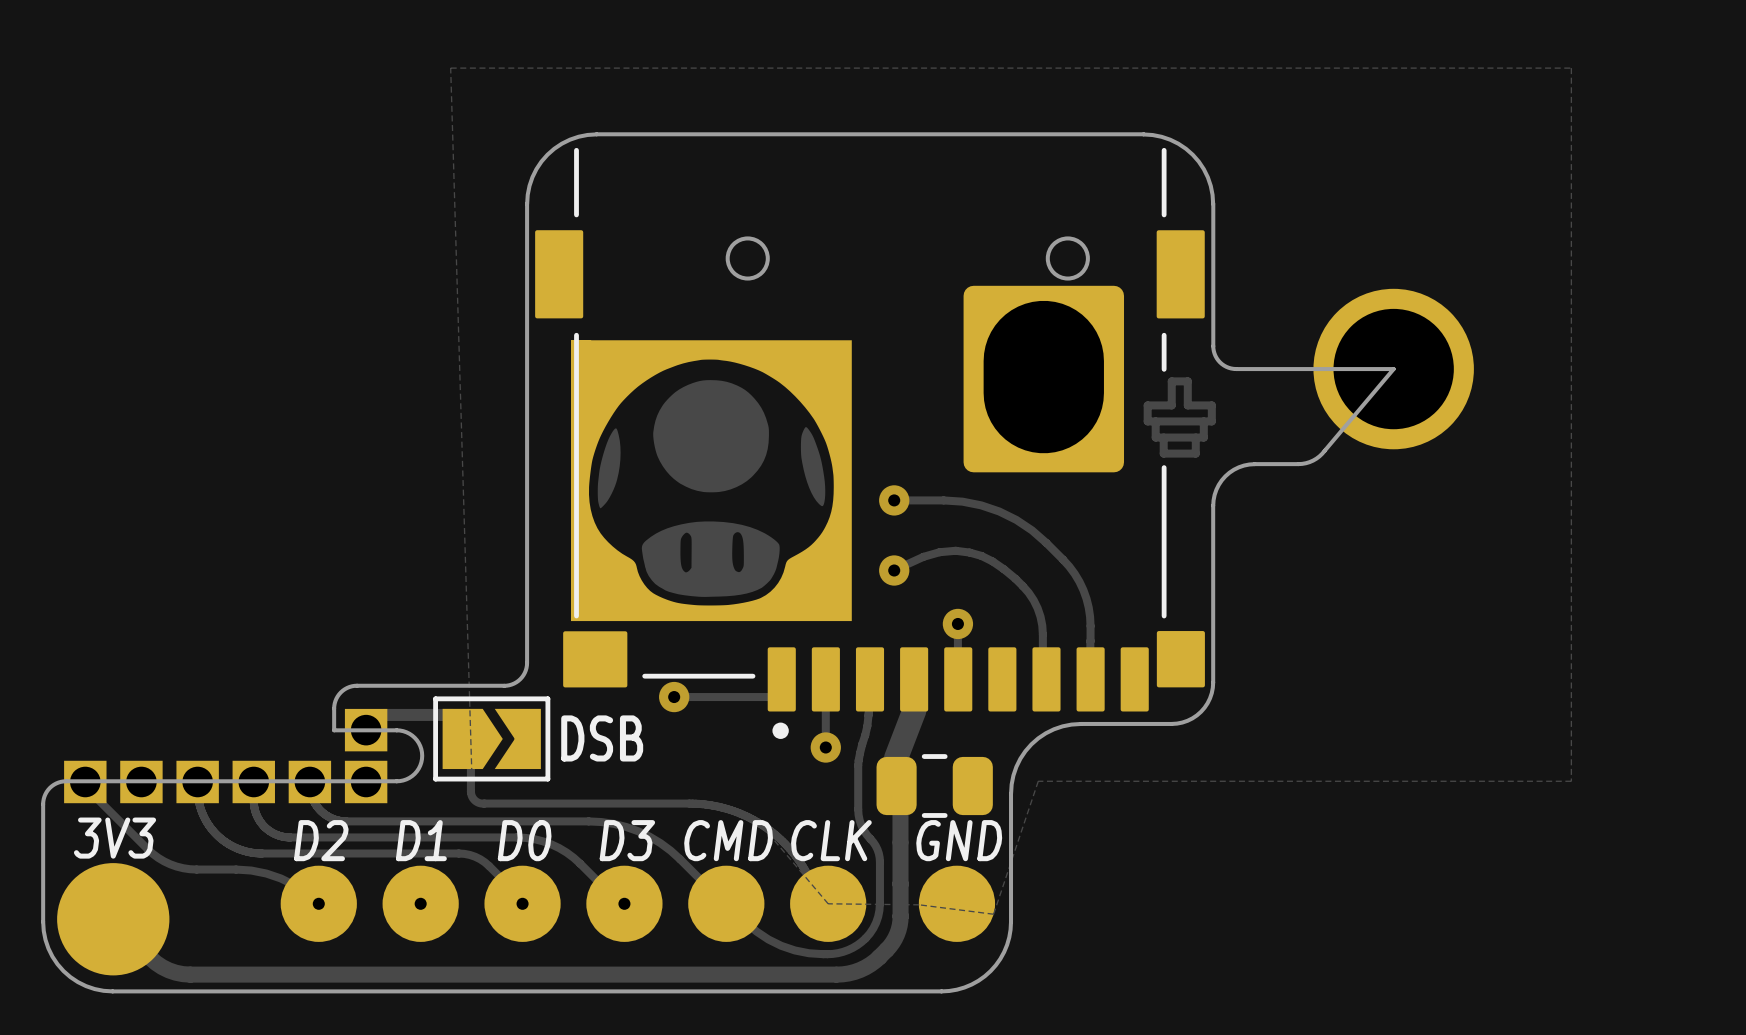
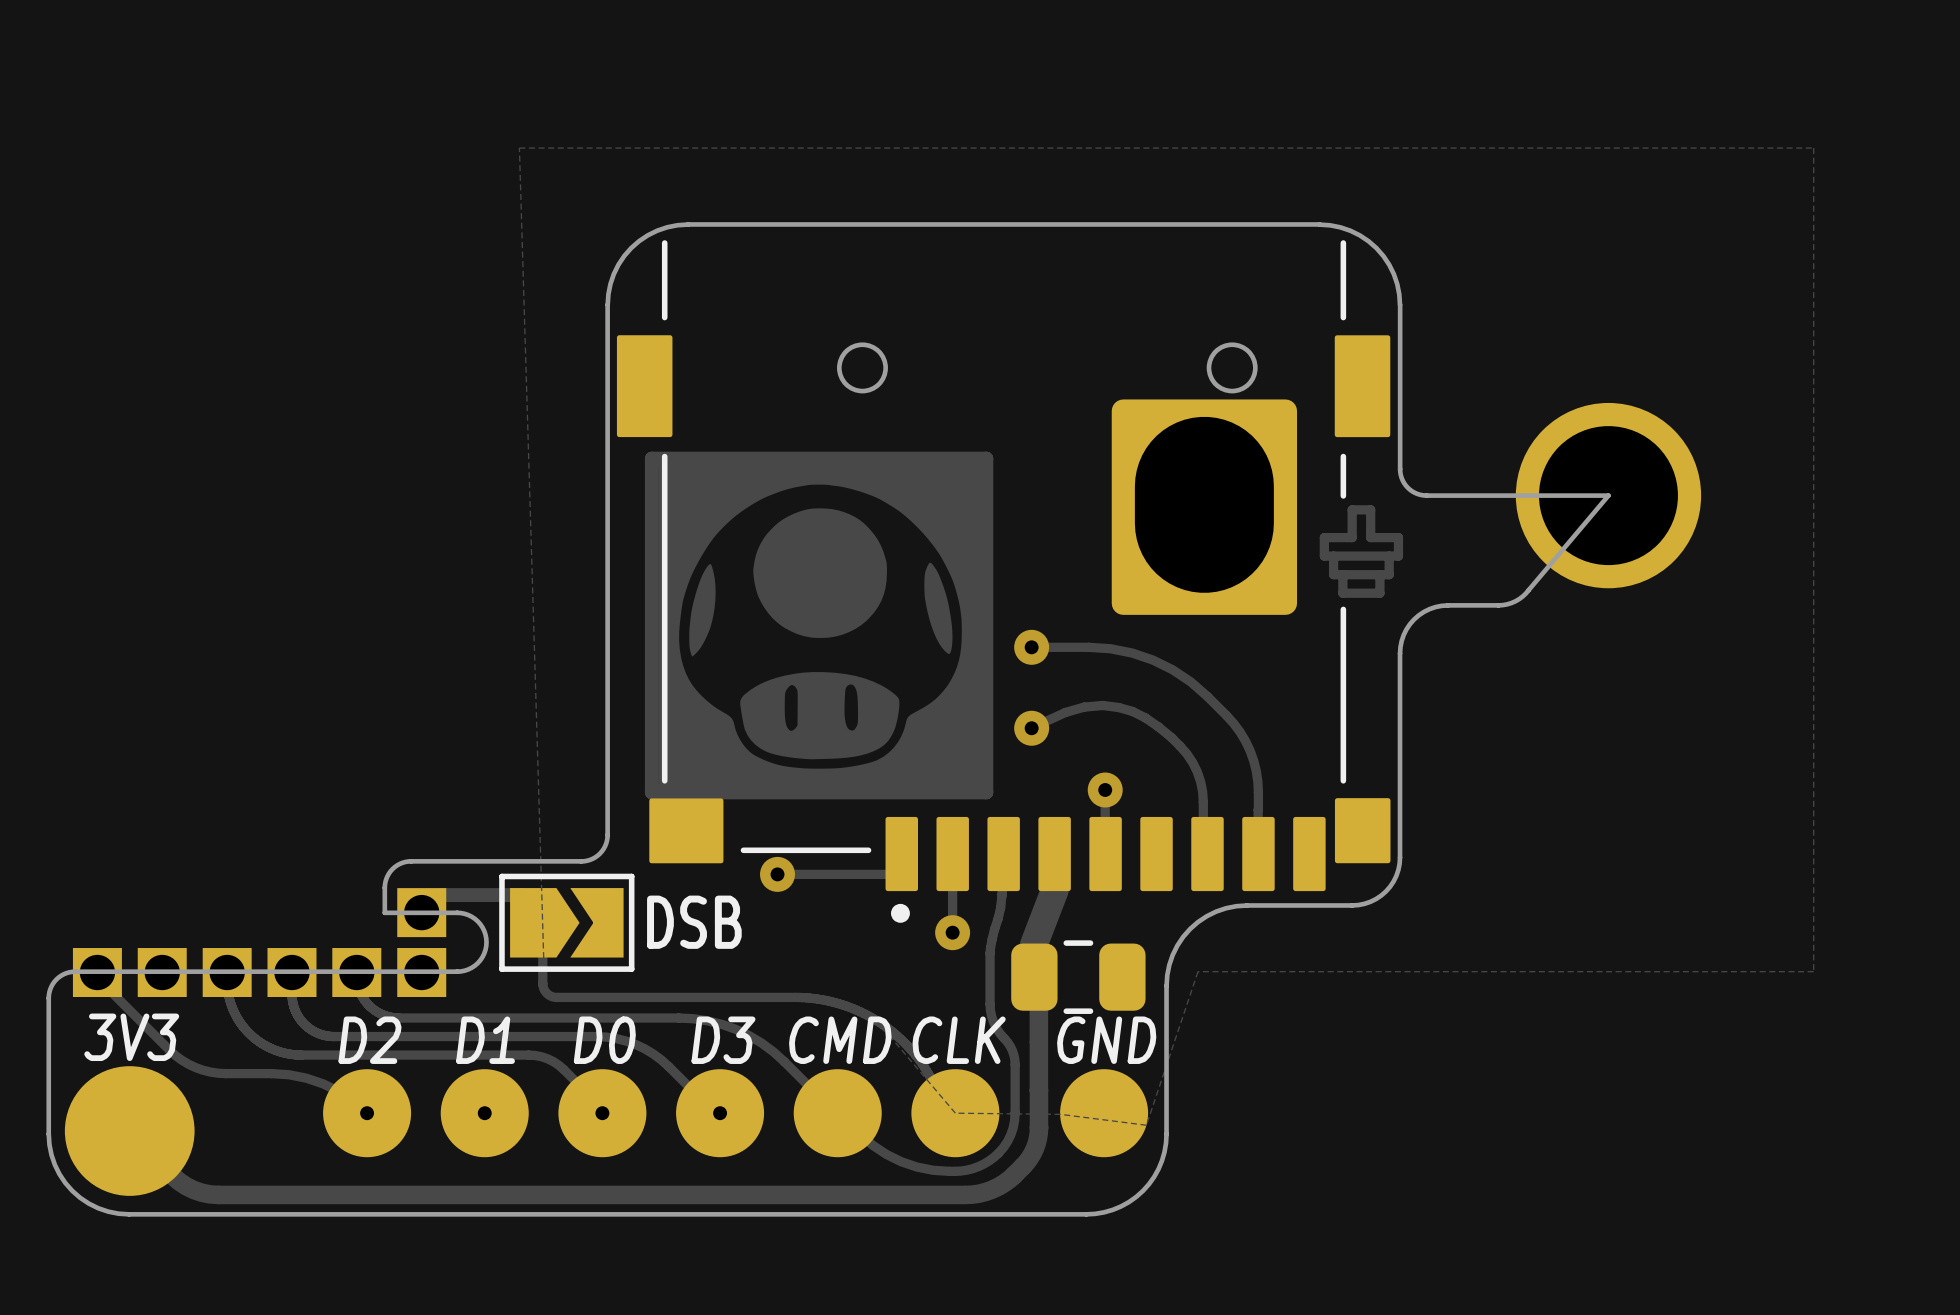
track: none -> (651, 458) (651, 792) (986, 792) (986, 458) (651, 458)
drawing: none -> [658, 462, 983, 787]
part: (711, 480) -> none

